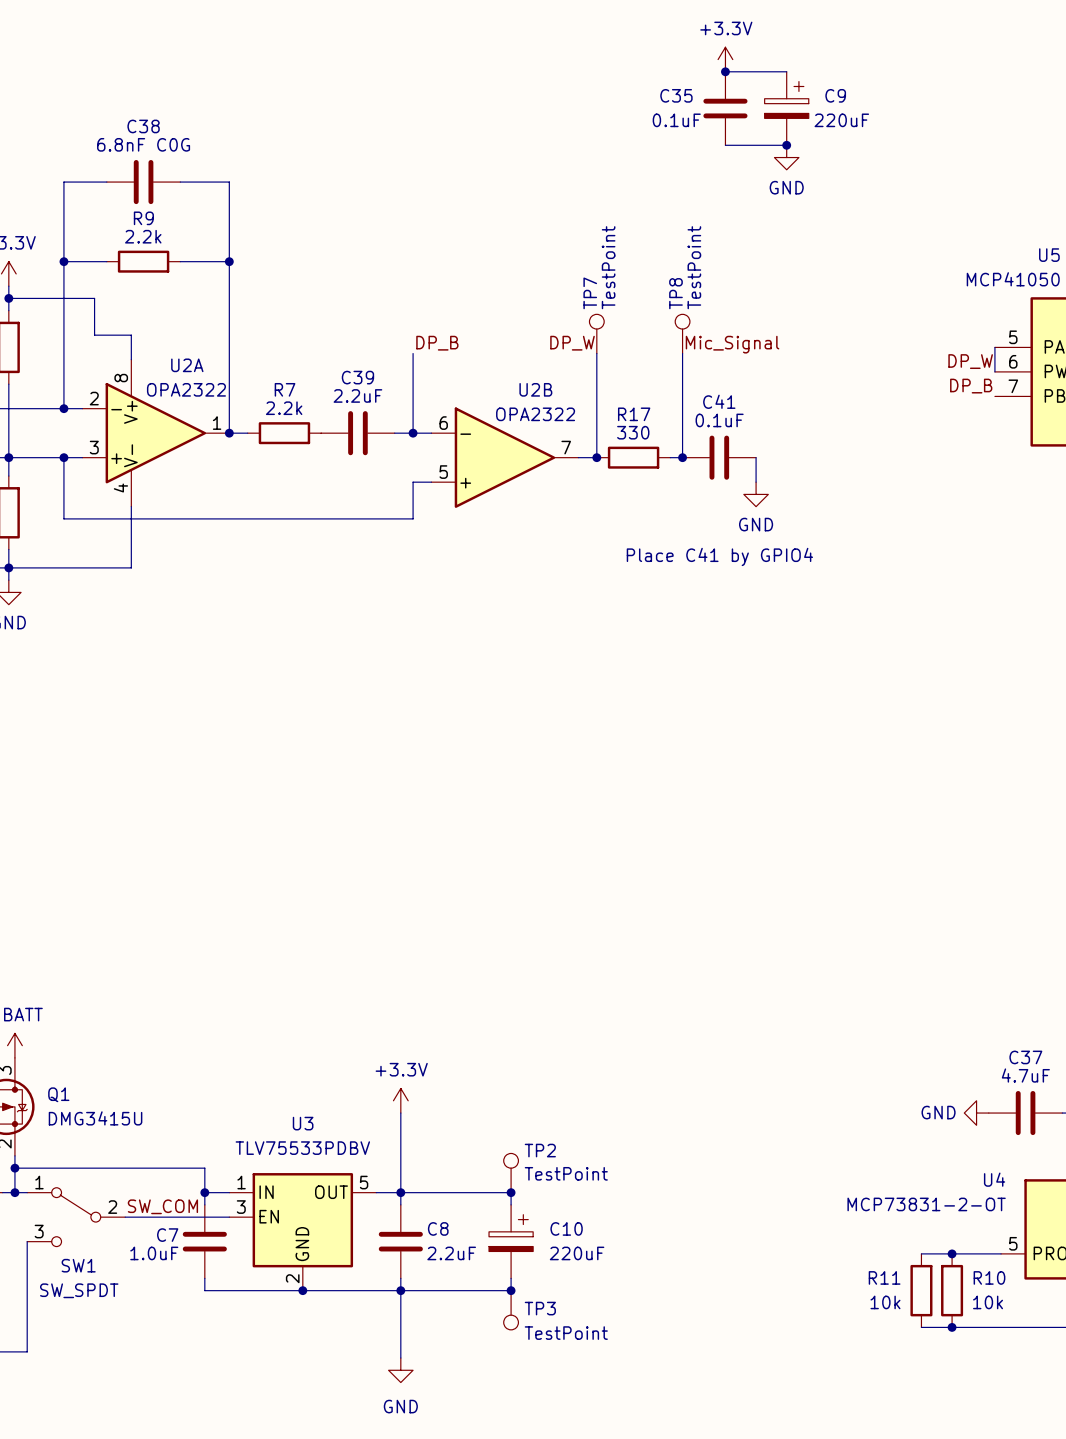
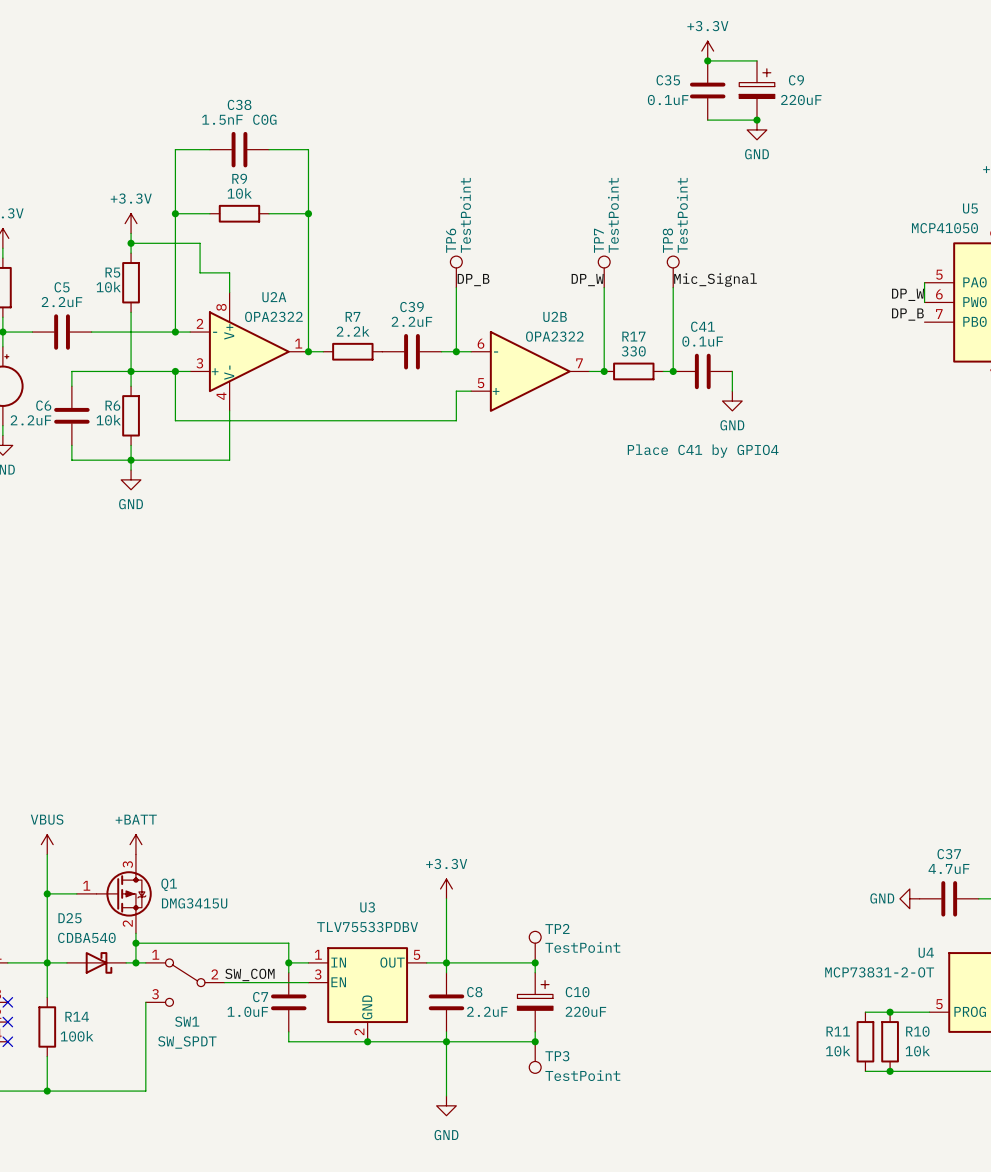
C38 value: 6.8nF C0G (143, 144) -> 1.5nF C0G (239, 119)
R9 value: 2.2k (143, 236) -> 10k (239, 193)
TP6: none -> TestPoint (456, 271)

